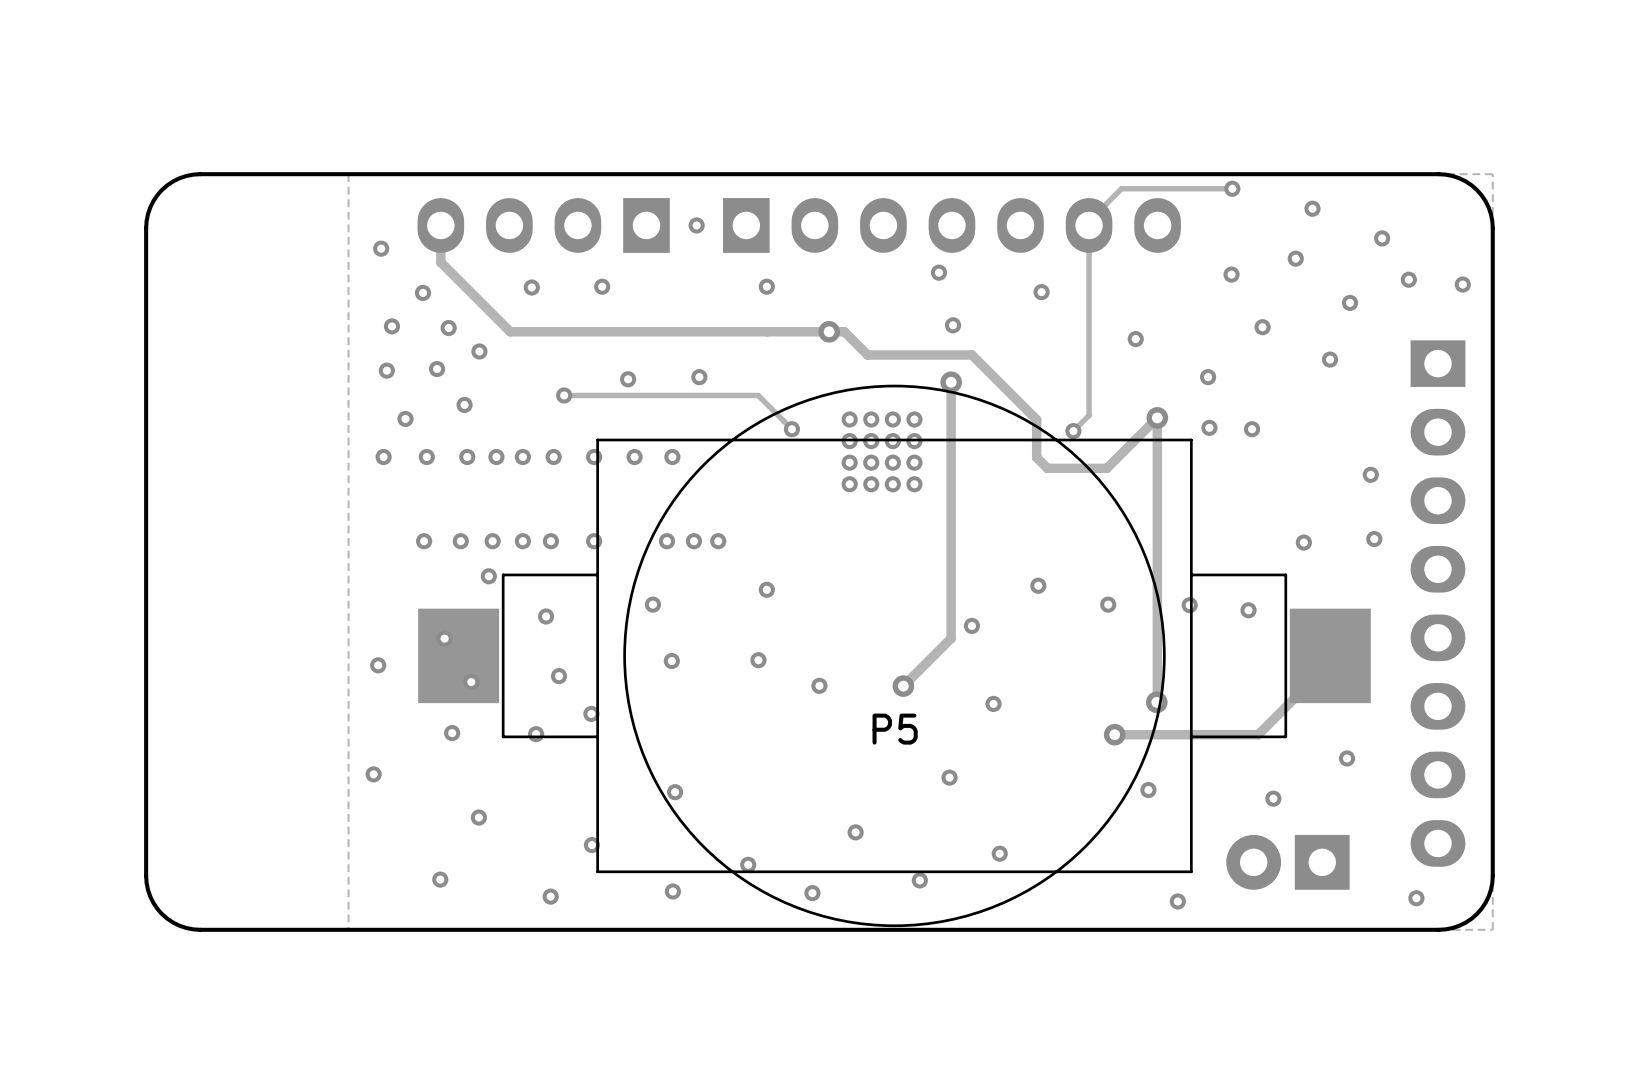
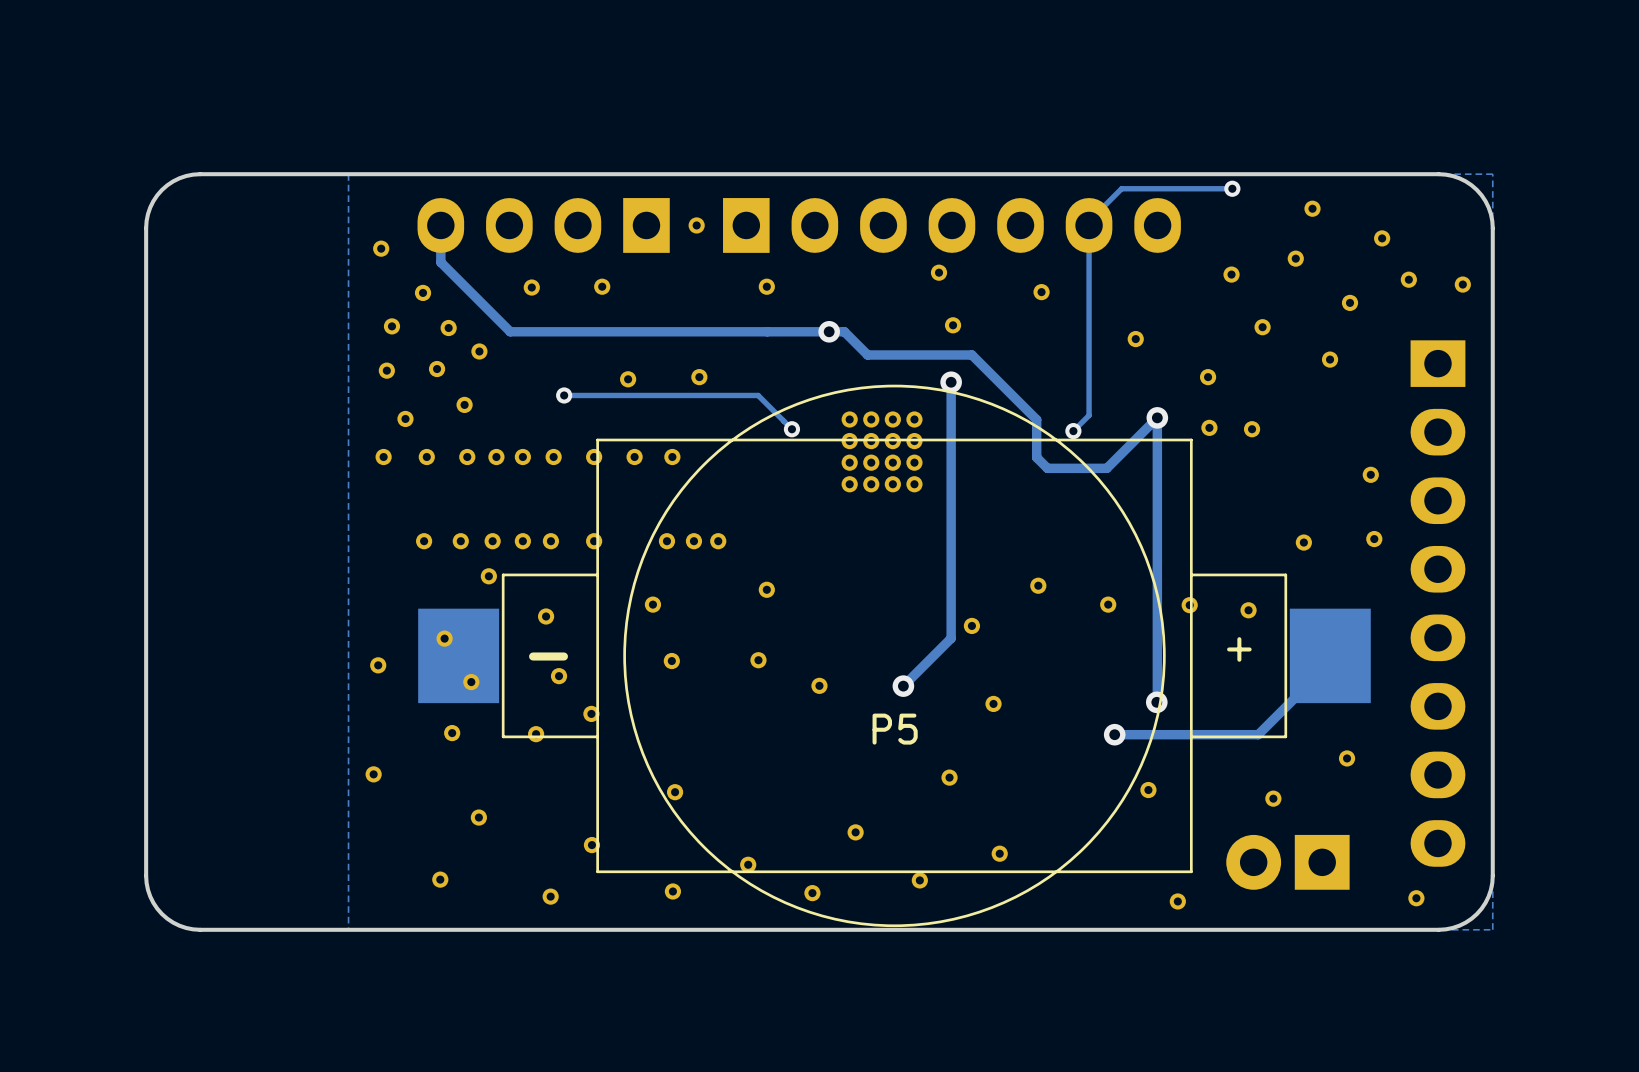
text: none -> + (1239, 649)
text: none -> - (548, 656)

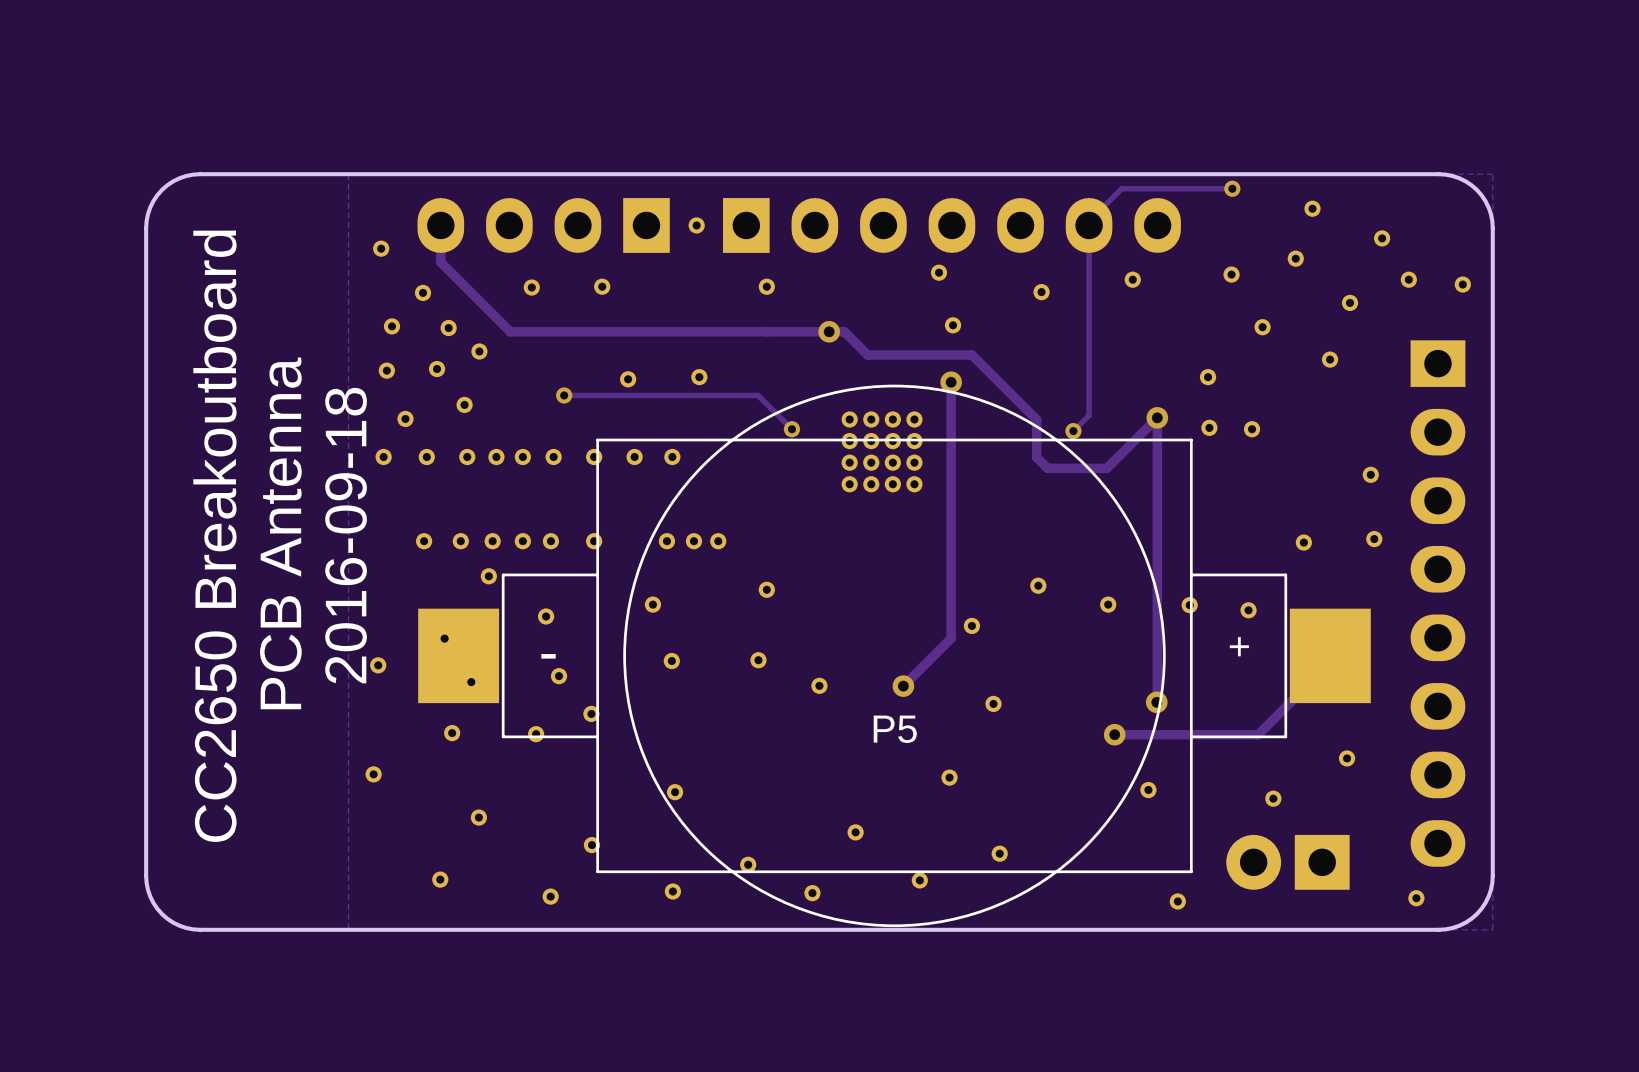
part position: (1135, 339) -> (1132, 279)
text: none -> PCB Antenna (280, 533)
text: none -> CC2650 Breakoutboard (214, 536)
text: none -> 2016-09-18 (346, 535)

